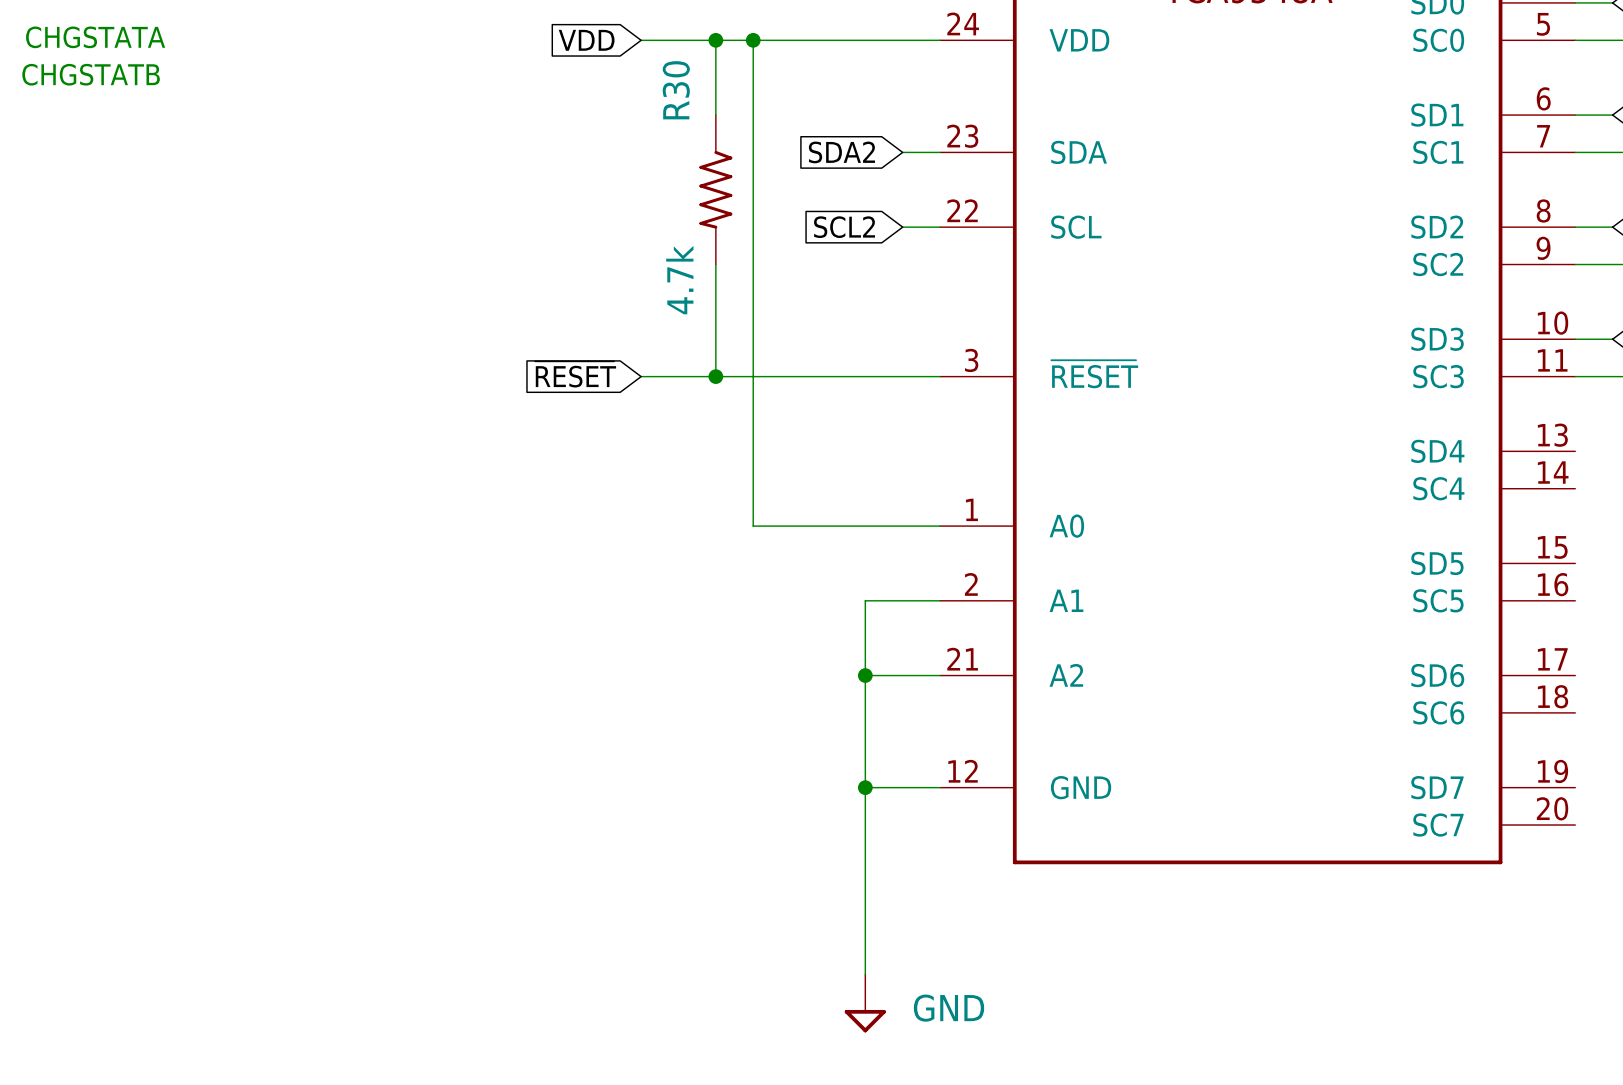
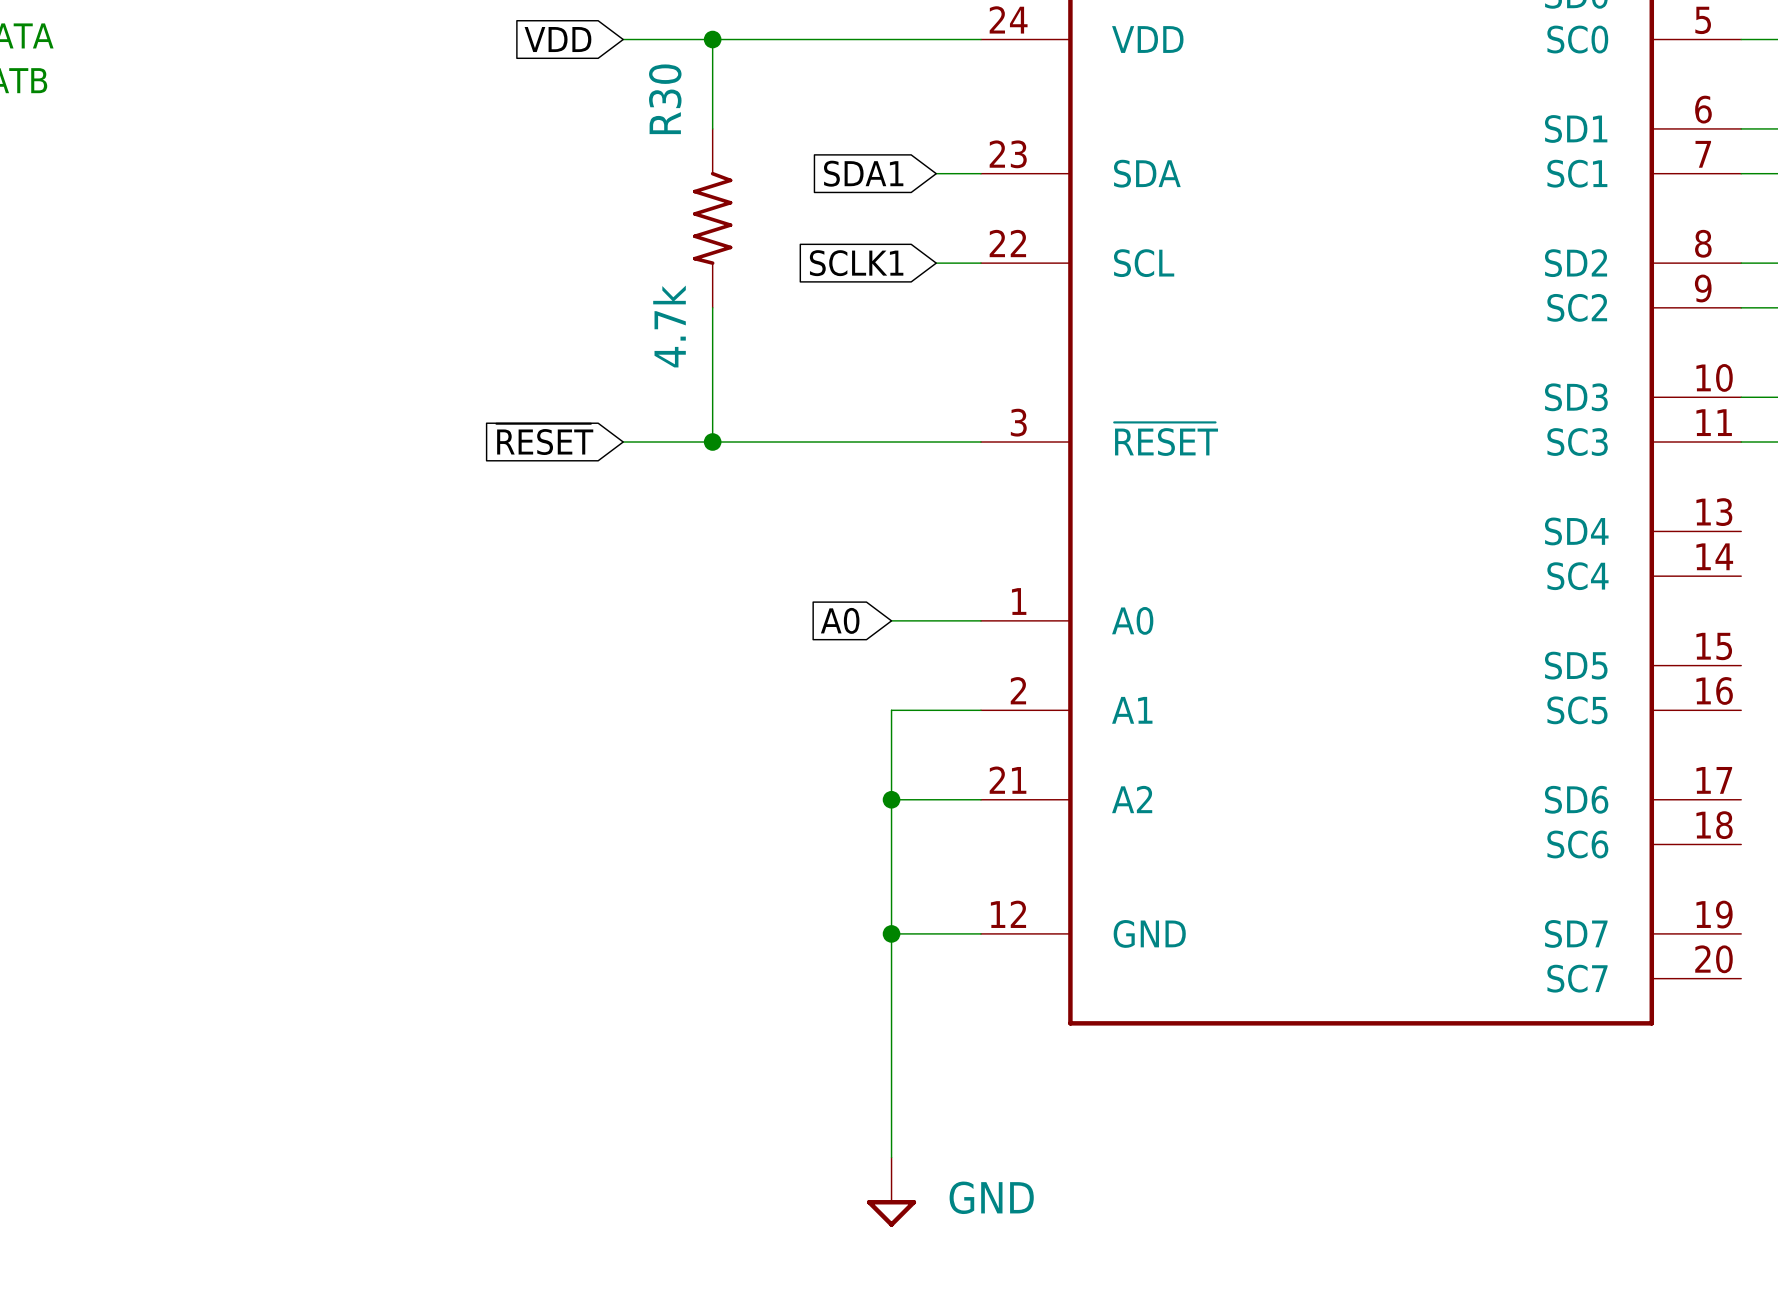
wire: (753, 40) (753, 526) (865, 526) -> none
junction: (753, 40) -> none
global label: SDA2 (841, 152) -> SDA1 (863, 173)
global label: SCL2 (844, 227) -> SCLK1 (856, 263)
global label: none -> A0 (840, 620)

